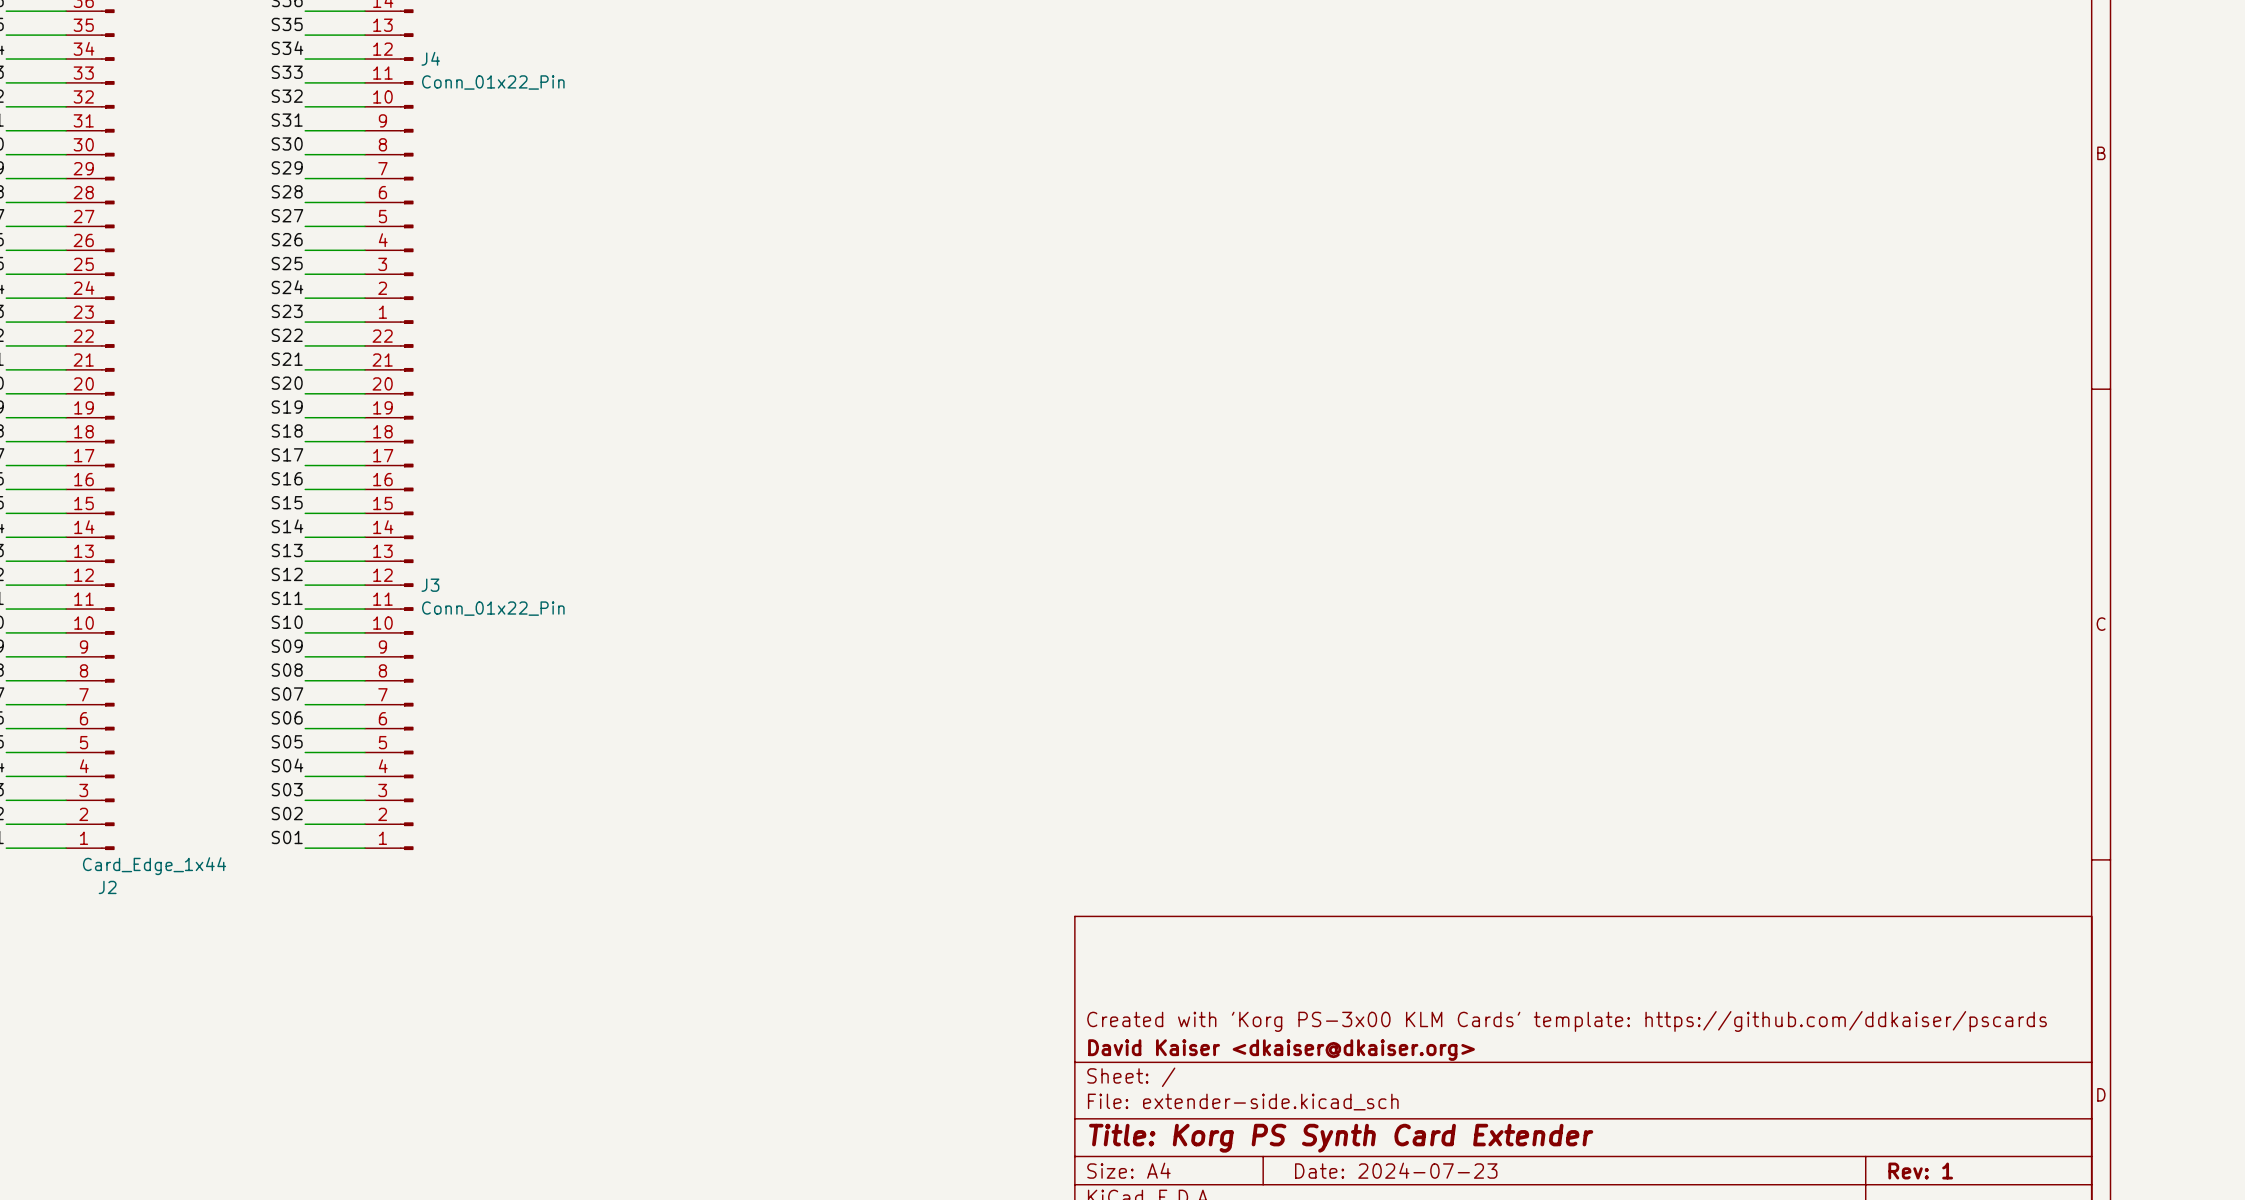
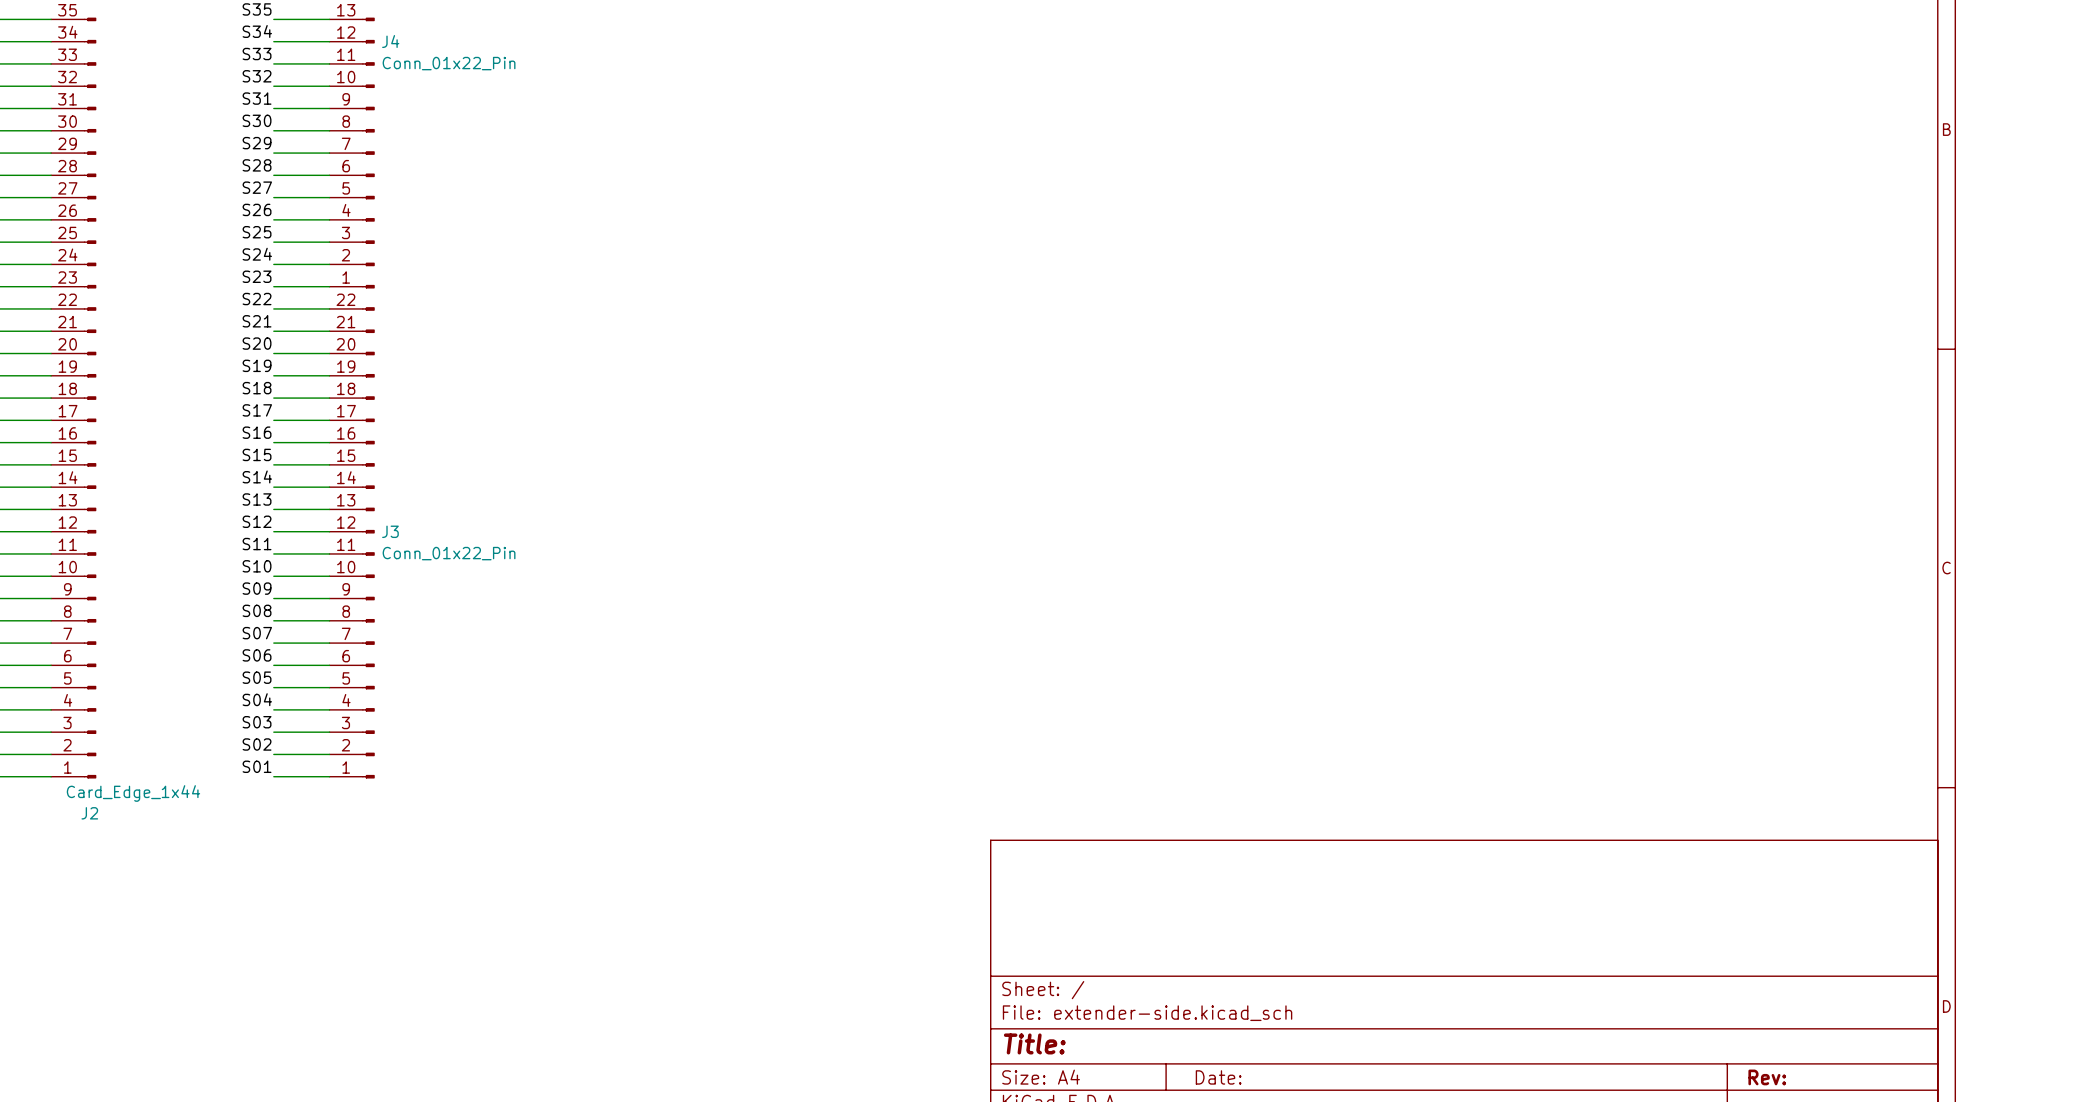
title block: Created with 'Korg PS-3x00 KLM Cards' template: https://github.com/ddkaiser/pscards (1567, 1021) -> none
title block: David Kaiser <dkaiser@dkaiser.org> (1281, 1050) -> none
title block: Title: Korg PS Synth Card Extender (1341, 1138) -> Title: (1034, 1043)
title block: Date: 2024-07-23 (1396, 1170) -> Date: (1218, 1077)
title block: Rev: 1 (1920, 1171) -> Rev: (1767, 1077)

